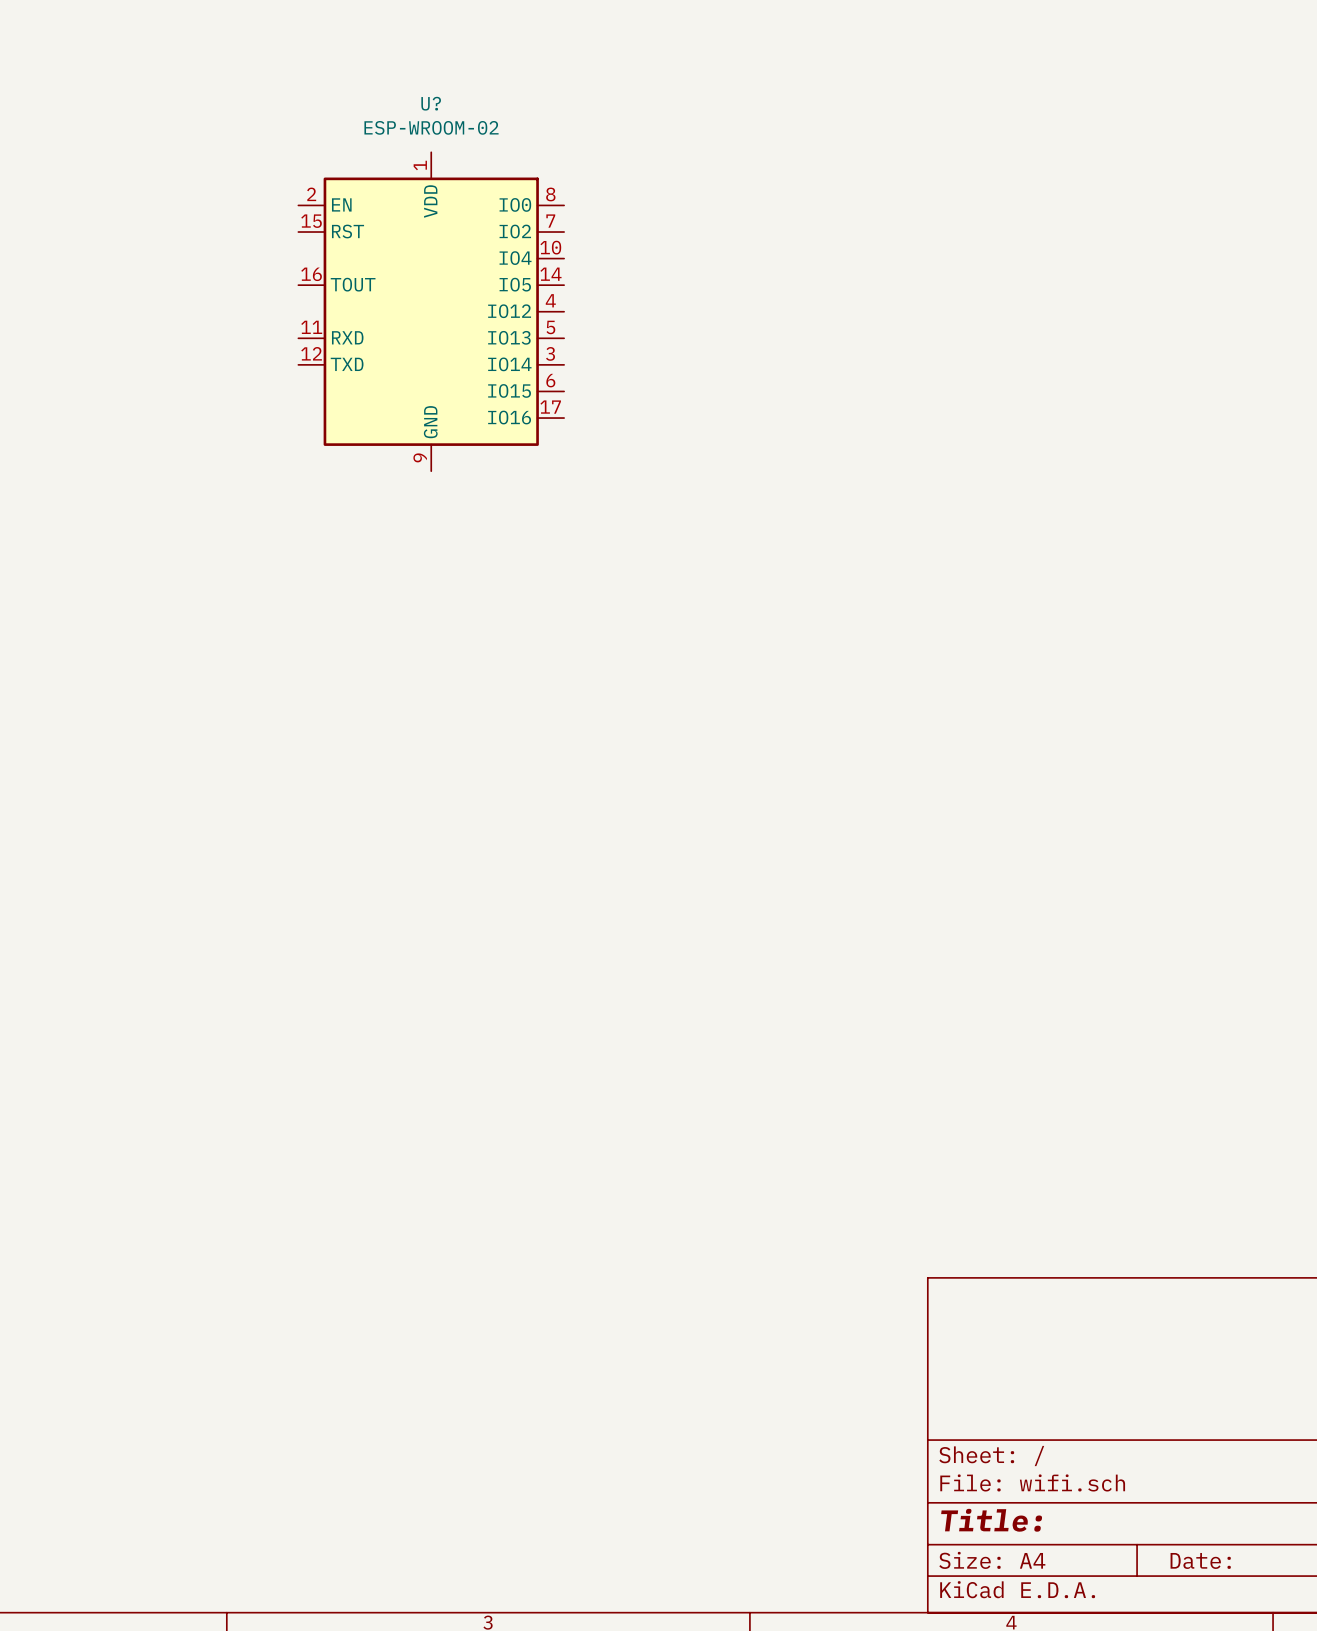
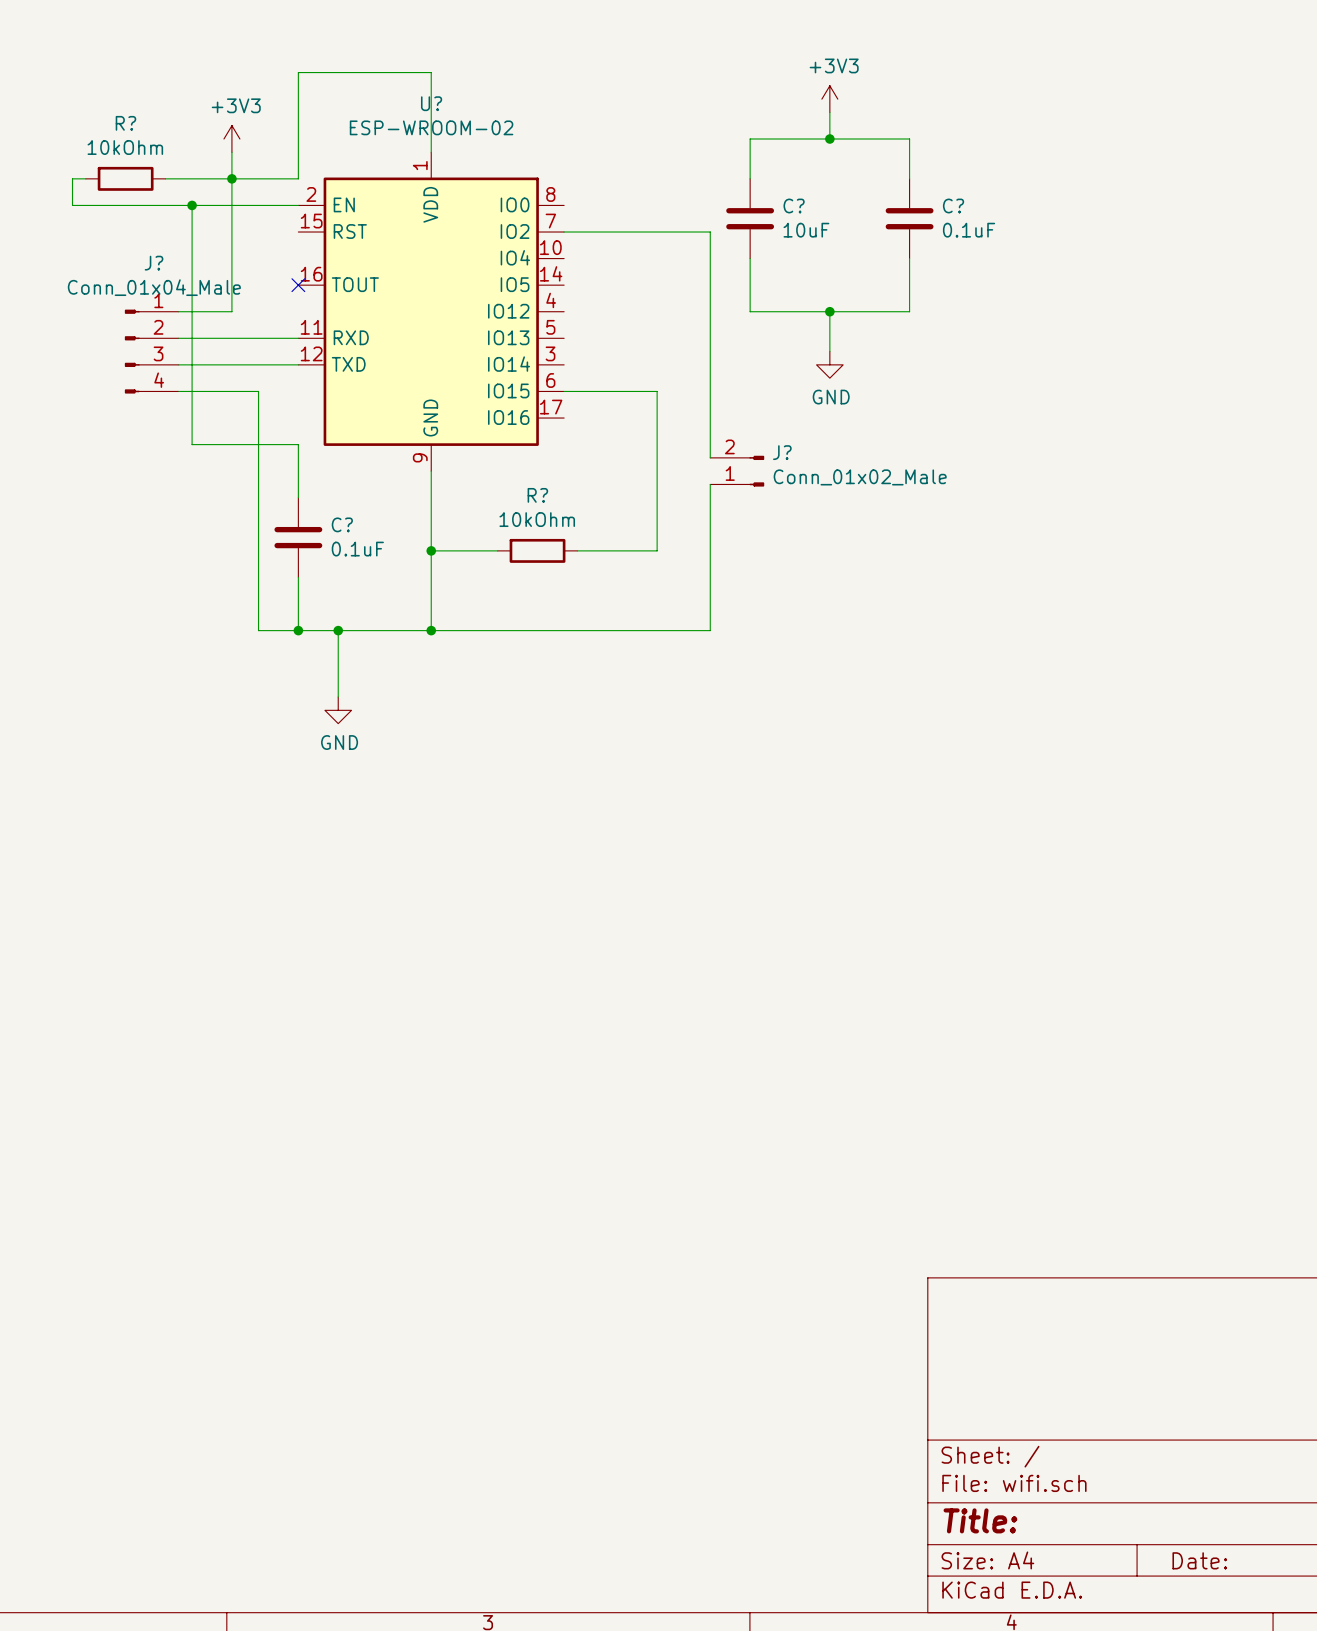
power symbol: none -> +3V3 (829, 99)
wire: none -> (829, 112) (829, 139)
power symbol: none -> +3V3 (231, 139)
junction: none -> (829, 139)
wire: none -> (231, 152) (231, 311) (178, 311)
wire: none -> (431, 152) (431, 72) (298, 72) (298, 178) (165, 178)
wire: none -> (85, 178) (72, 178) (72, 205) (298, 205)
R?: none -> 10kOhm (125, 178)
junction: none -> (231, 178)
wire: none -> (750, 178) (750, 139) (909, 139) (909, 178)
wire: none -> (192, 205) (192, 444) (298, 444) (298, 497)
junction: none -> (192, 205)
C?: none -> 10uF (750, 218)
C?: none -> 0.1uF (909, 218)
wire: none -> (564, 232) (710, 232) (710, 457)
wire: none -> (750, 258) (750, 311) (909, 311) (909, 258)
no-connect mark: none -> (298, 285)
wire: none -> (829, 311) (829, 351)
junction: none -> (829, 311)
wire: none -> (178, 338) (298, 338)
J?: none -> Conn_01x04_Male (151, 351)
wire: none -> (178, 364) (298, 364)
power symbol: none -> GND (829, 364)
wire: none -> (178, 391) (258, 391) (258, 630) (710, 630) (710, 484)
wire: none -> (564, 391) (657, 391) (657, 550) (577, 550)
wire: none -> (431, 471) (431, 630)
J?: none -> Conn_01x02_Male (737, 471)
C?: none -> 0.1uF (298, 537)
wire: none -> (431, 550) (497, 550)
junction: none -> (431, 550)
R?: none -> 10kOhm (537, 550)
wire: none -> (298, 577) (298, 630)
junction: none -> (298, 630)
wire: none -> (338, 630) (338, 697)
junction: none -> (338, 630)
junction: none -> (431, 630)
power symbol: none -> GND (338, 710)

